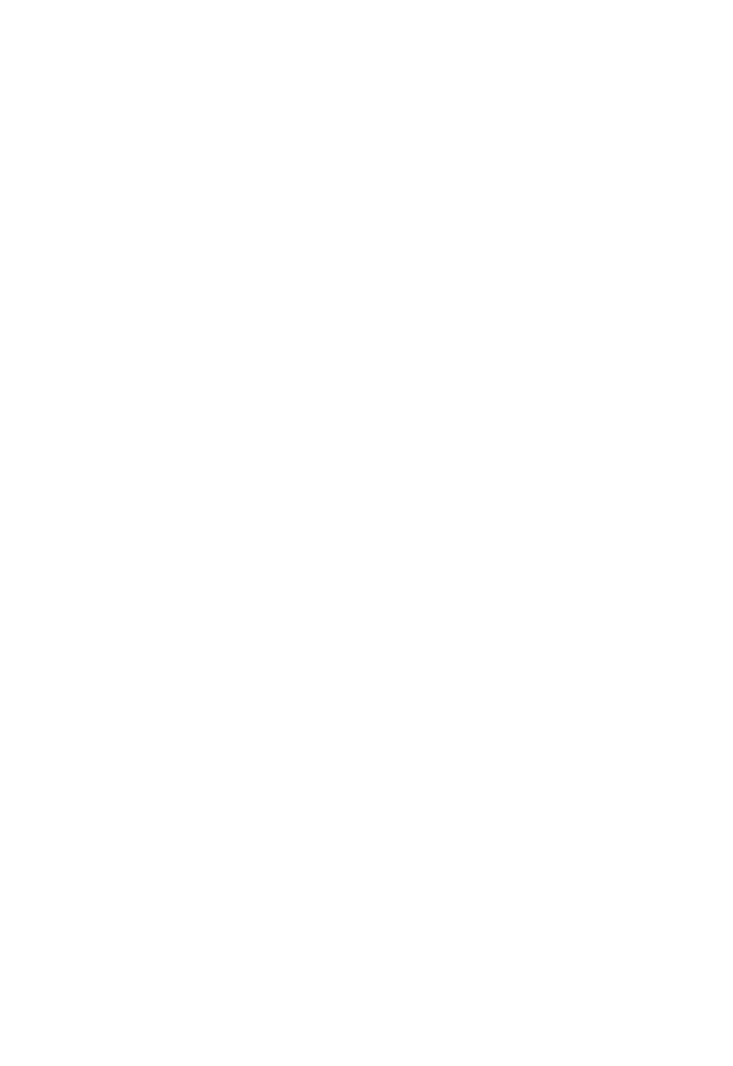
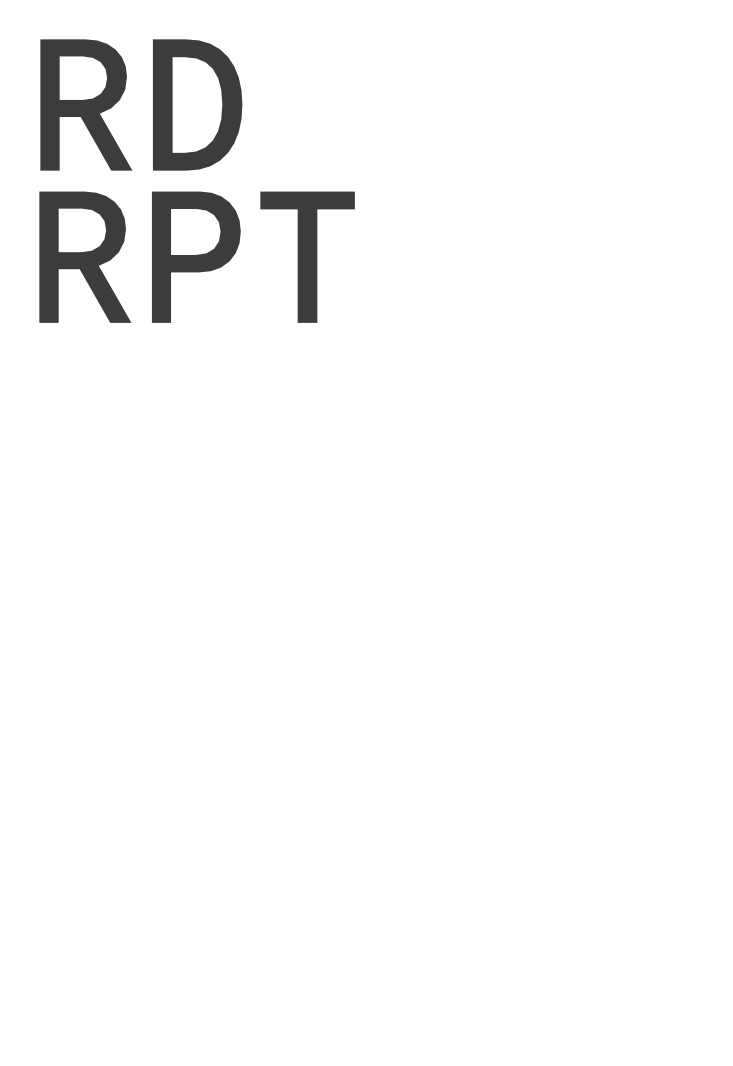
drawing: none -> [40, 39, 243, 171]
drawing: none -> [39, 191, 355, 323]

